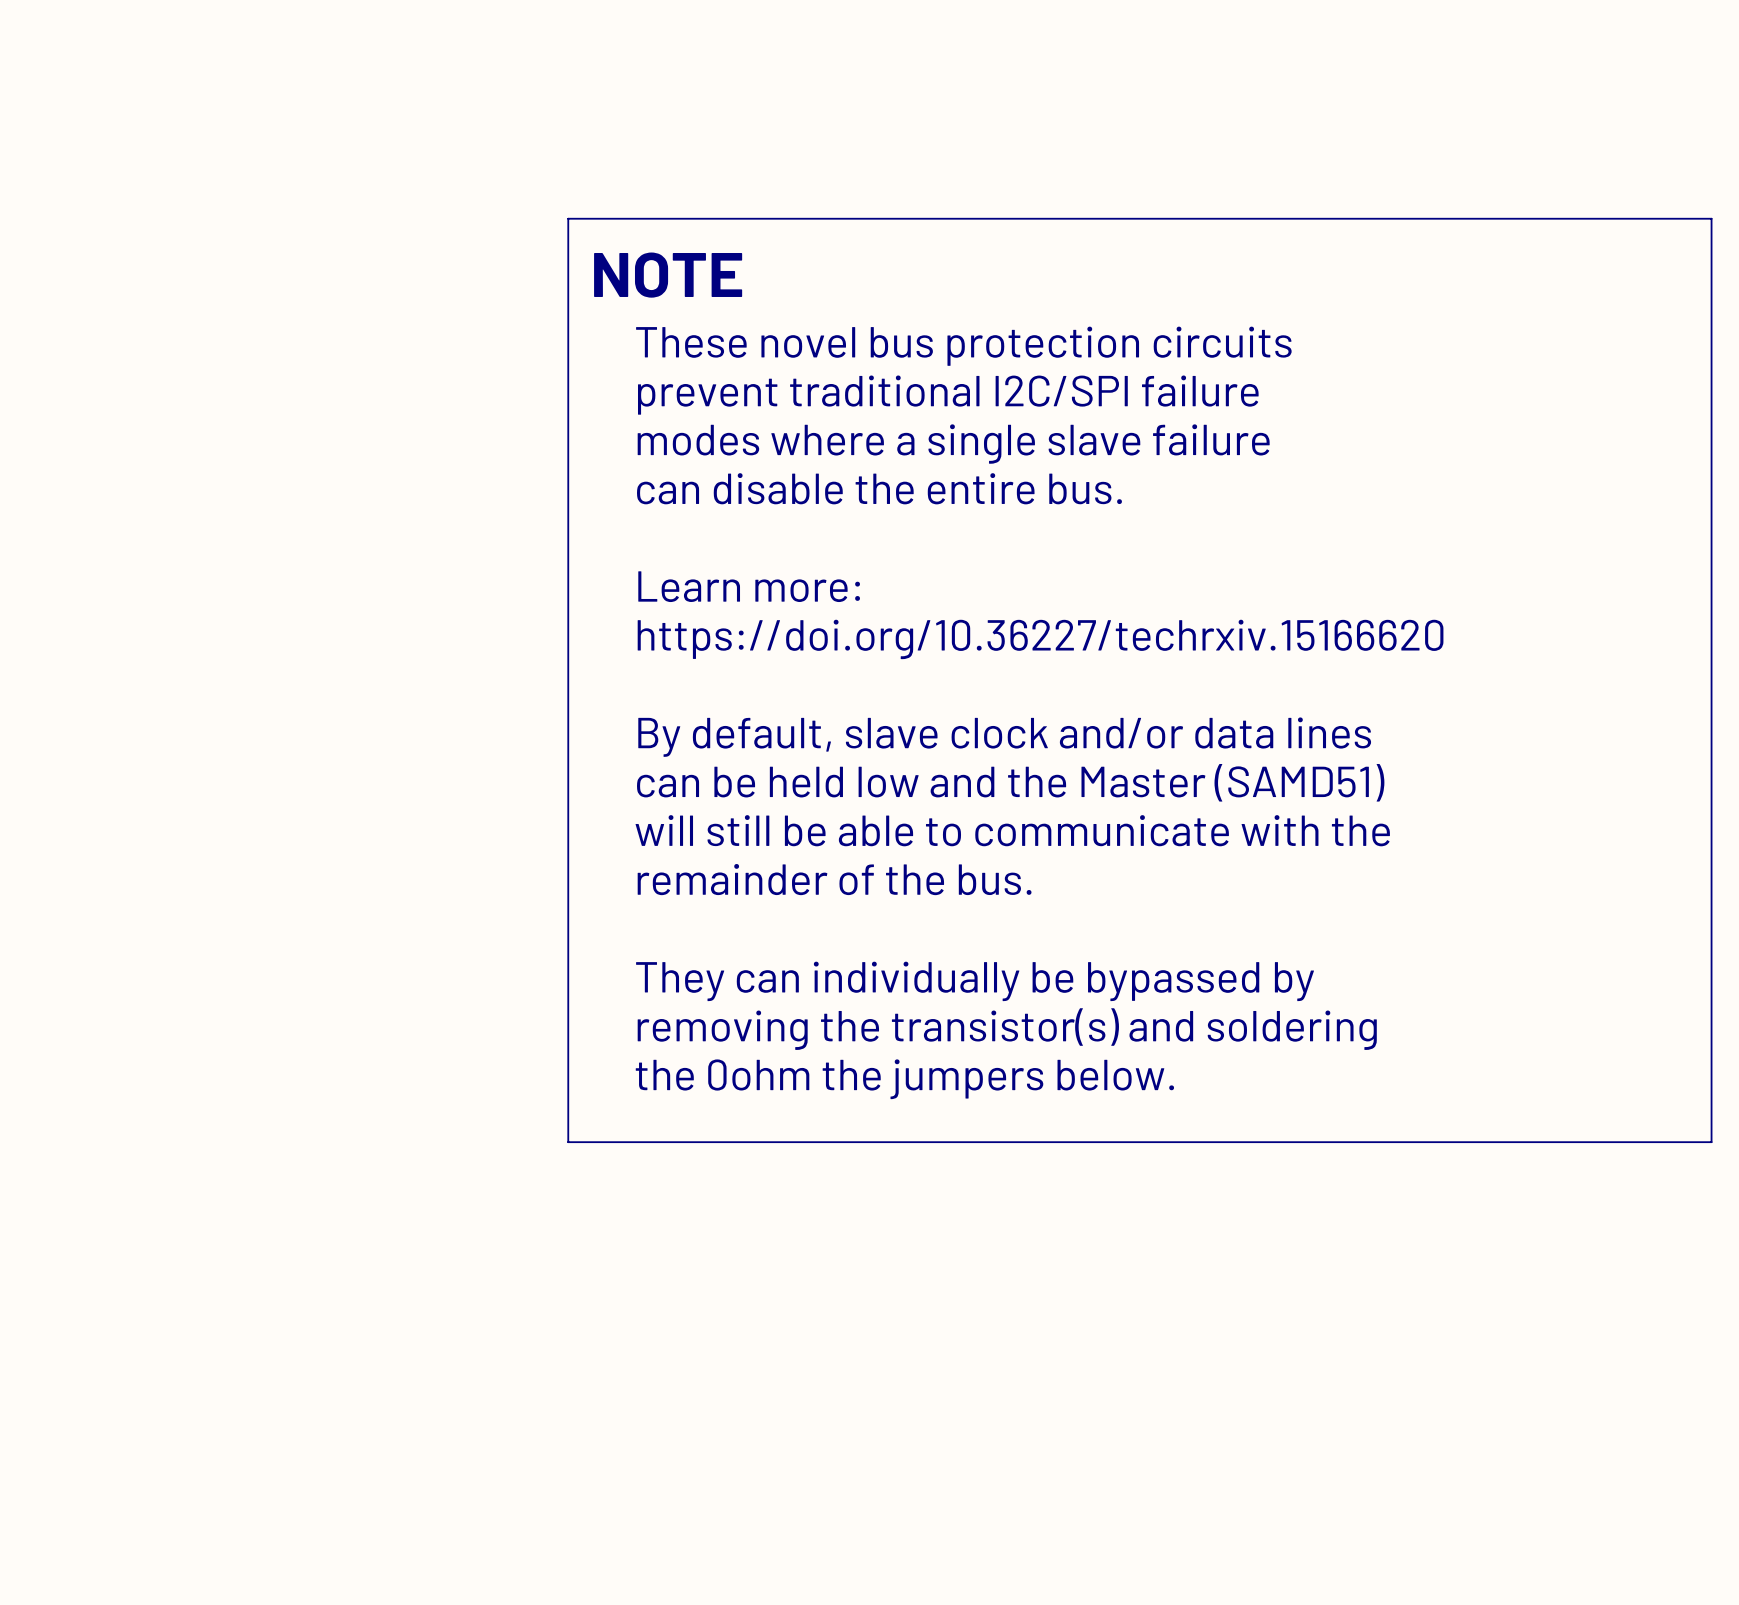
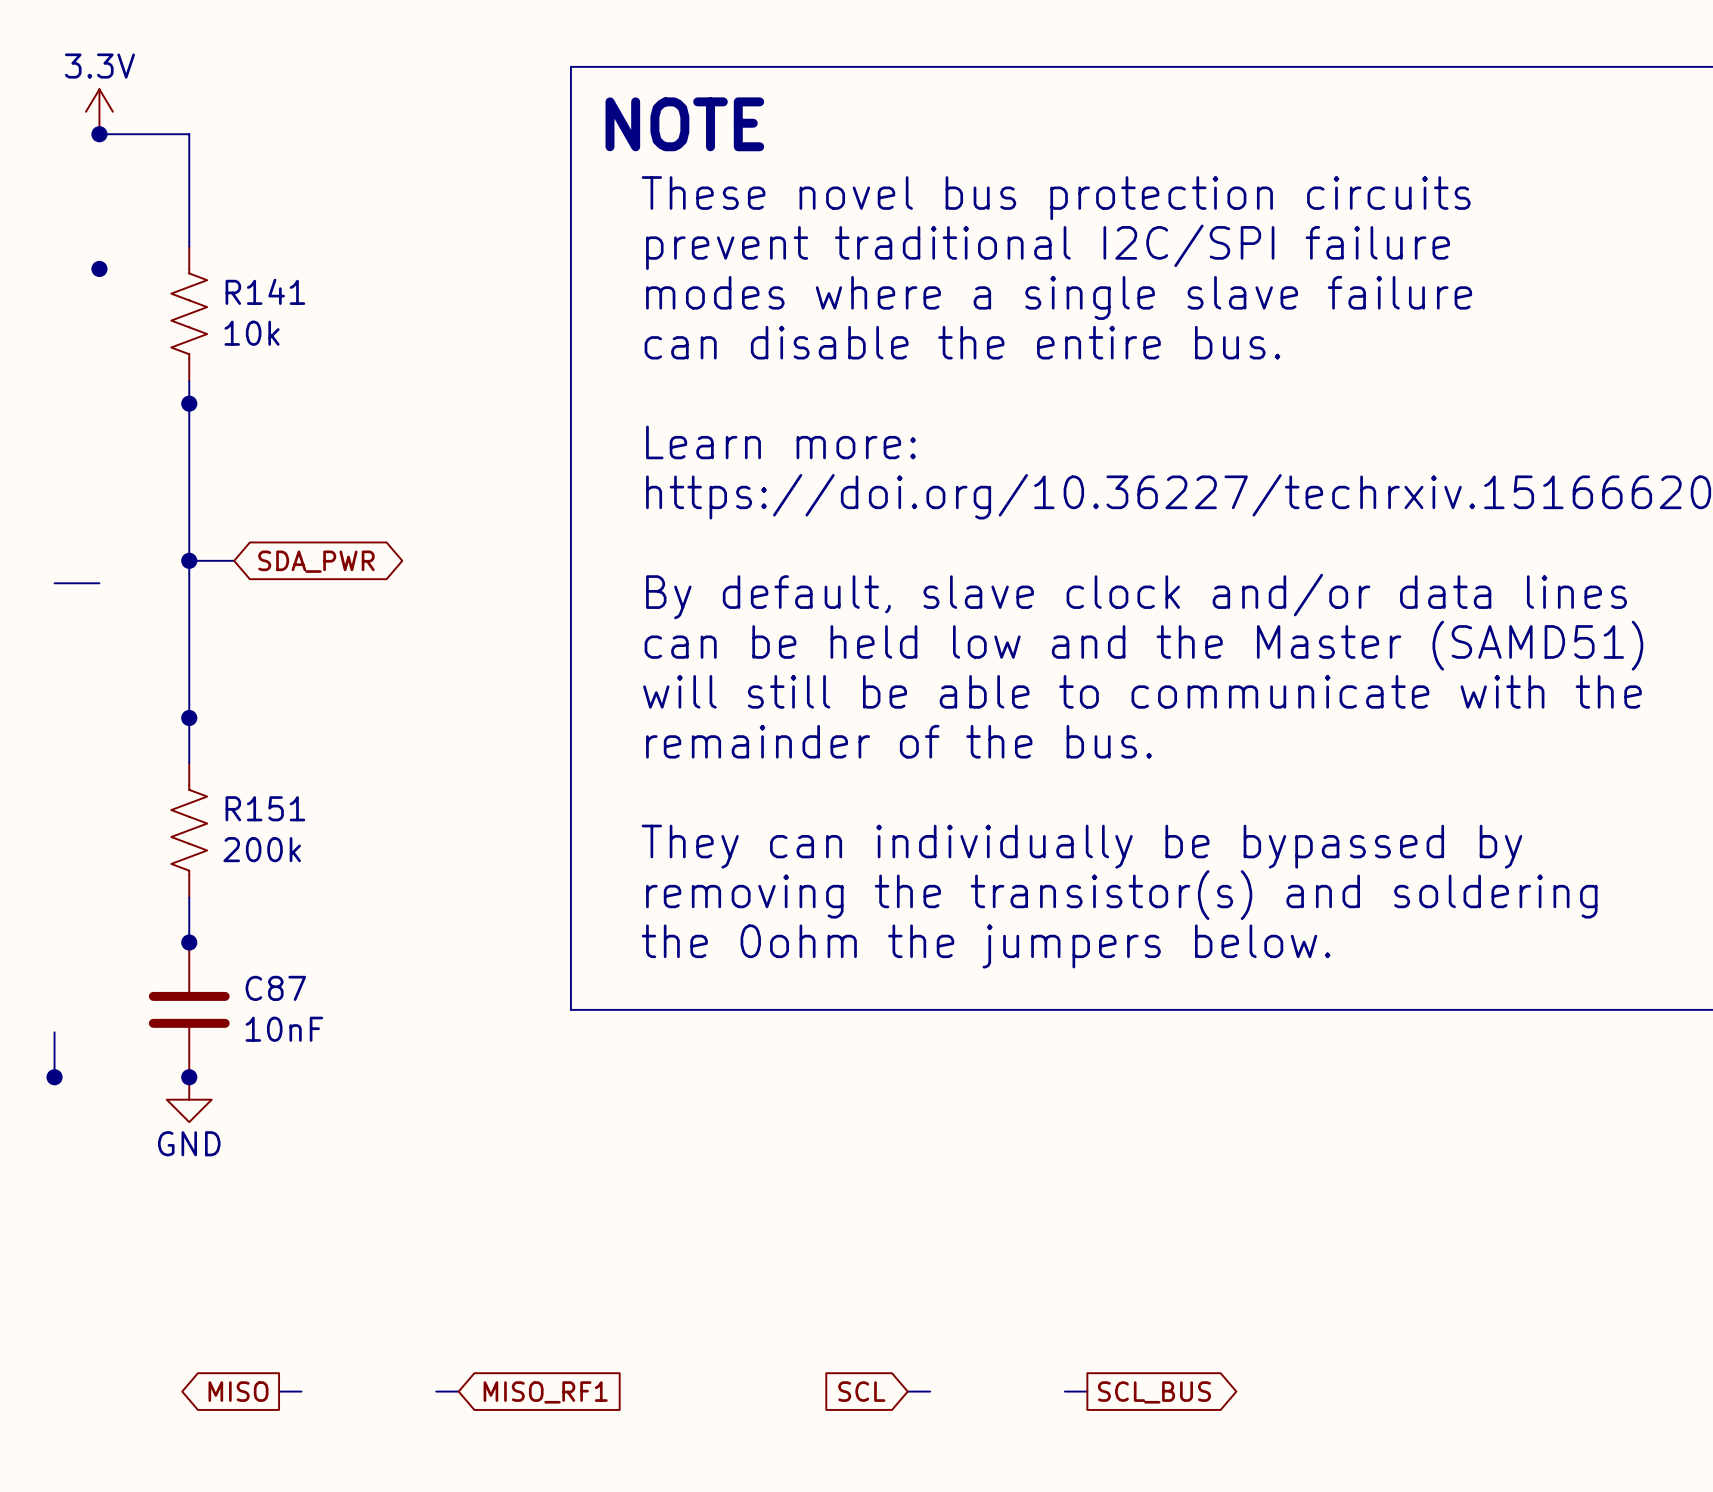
power symbol: none -> 3.3V (99, 111)
wire: none -> (99, 134) (189, 134) (189, 246)
junction: none -> (99, 134)
junction: none -> (99, 268)
R141: none -> 10k (189, 313)
wire: none -> (189, 381) (189, 762)
junction: none -> (189, 403)
wire: none -> (189, 560) (234, 560)
junction: none -> (189, 560)
global label: none -> SDA_PWR (316, 561)
wire: none -> (54, 583) (99, 583)
junction: none -> (189, 718)
R151: none -> 200k (189, 830)
wire: none -> (189, 897) (189, 942)
junction: none -> (189, 942)
C87: none -> 10nF (189, 1009)
wire: none -> (54, 1032) (54, 1077)
junction: none -> (54, 1077)
junction: none -> (189, 1077)
power symbol: none -> GND (189, 1099)
global label: none -> MISO (238, 1391)
wire: none -> (279, 1391) (301, 1391)
wire: none -> (436, 1391) (458, 1391)
global label: none -> MISO_RF1 (545, 1392)
global label: none -> SCL (861, 1391)
wire: none -> (907, 1391) (930, 1391)
wire: none -> (1064, 1391) (1087, 1391)
global label: none -> SCL_BUS (1154, 1392)

